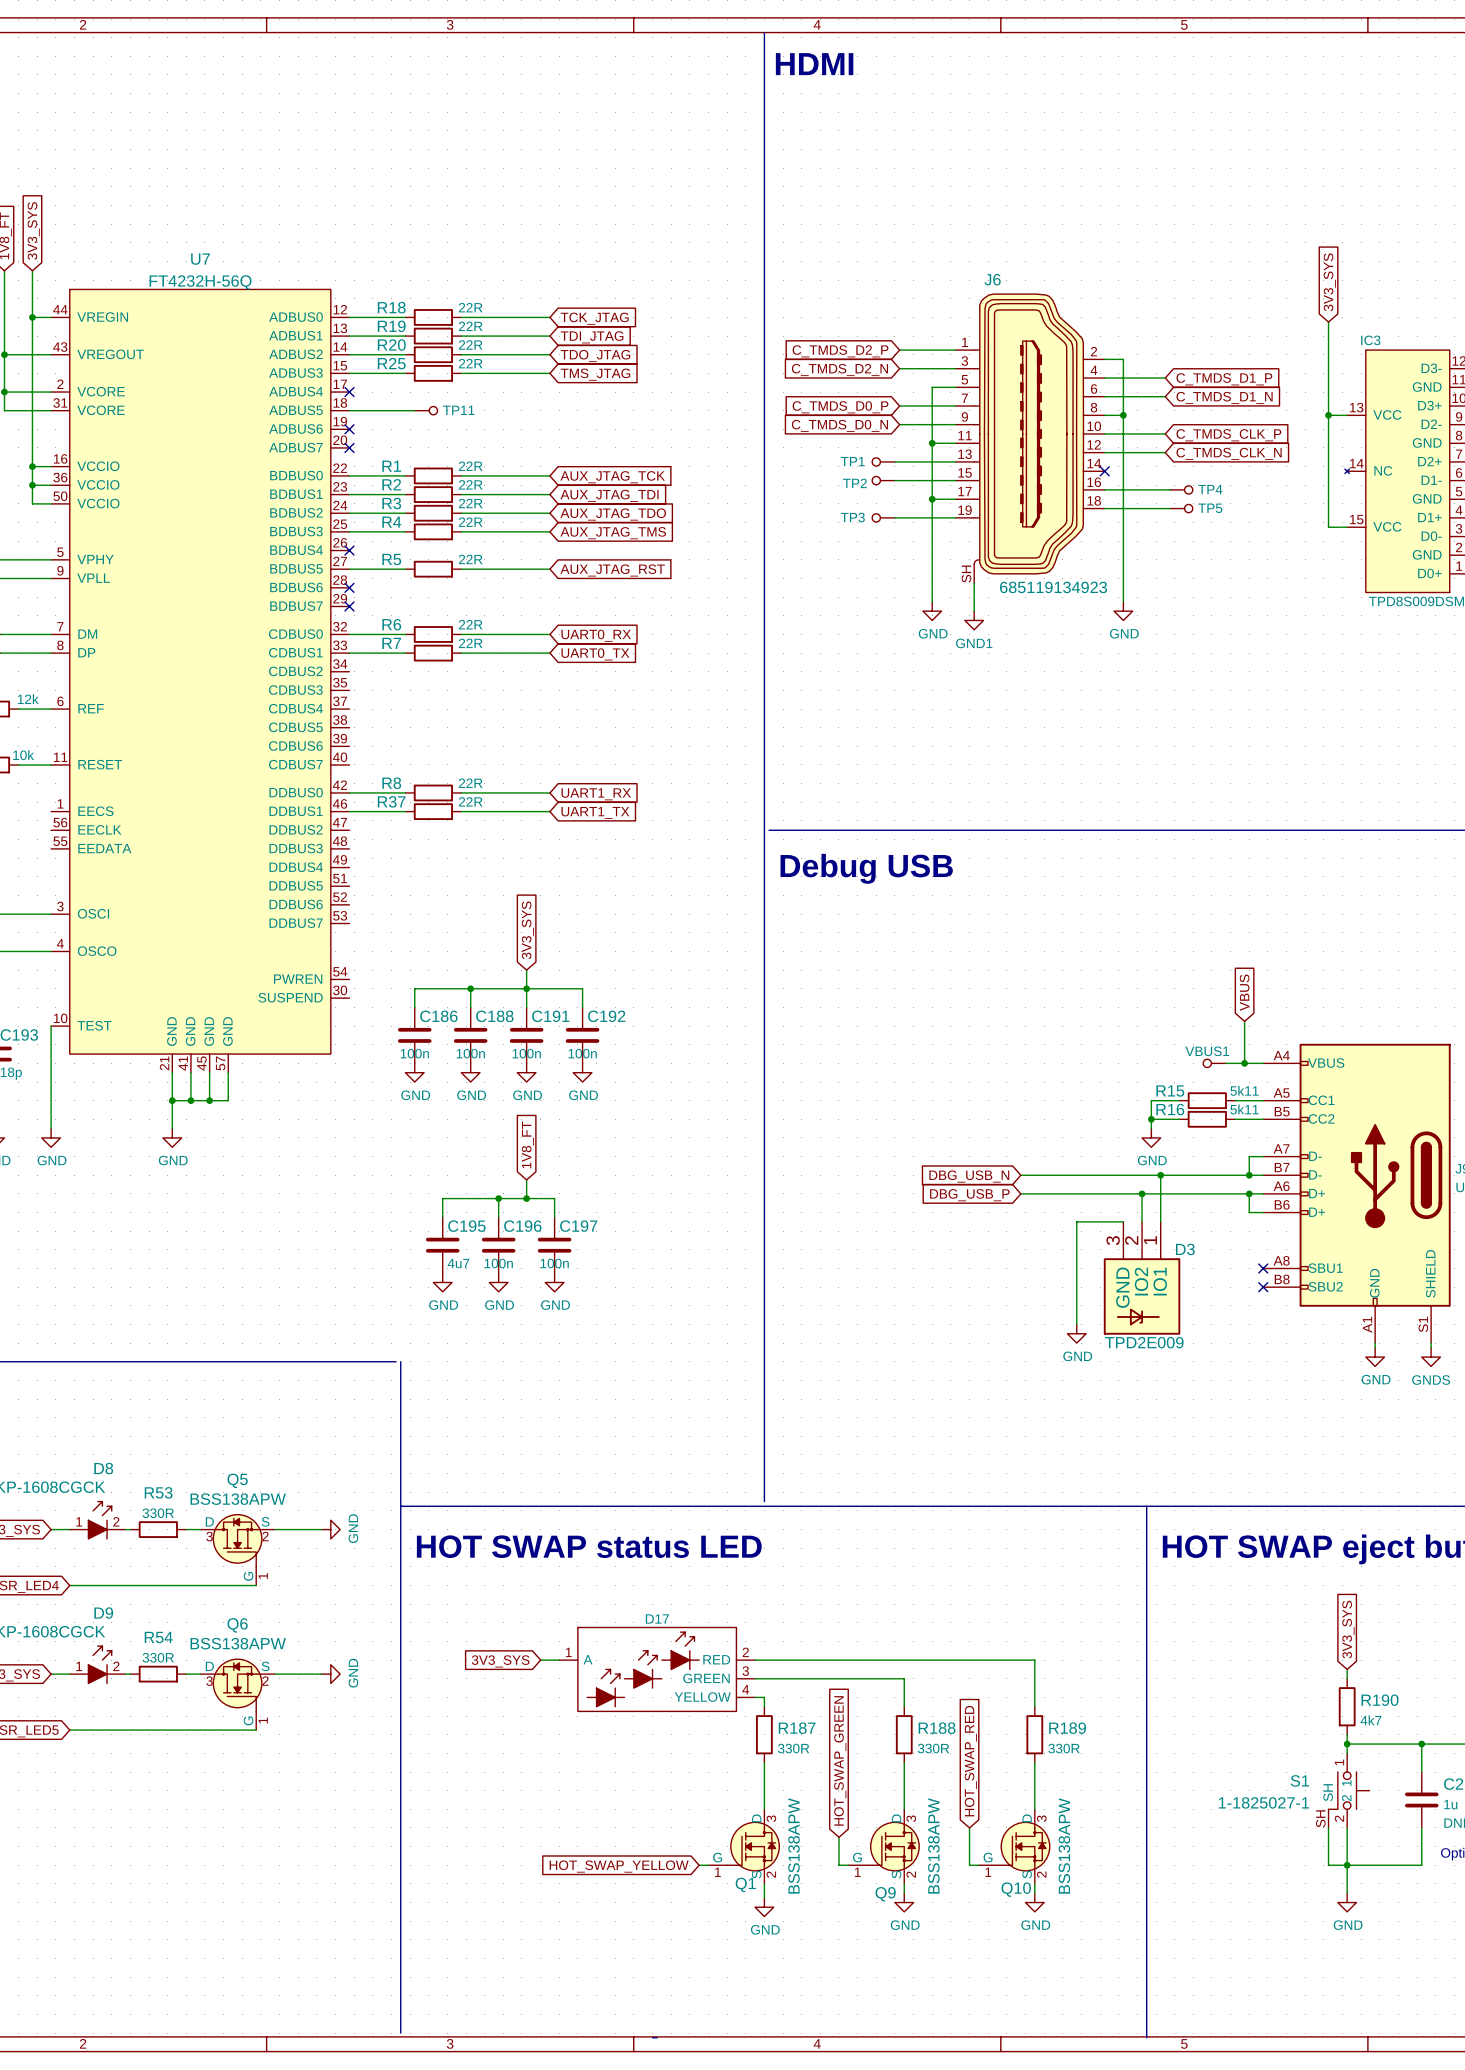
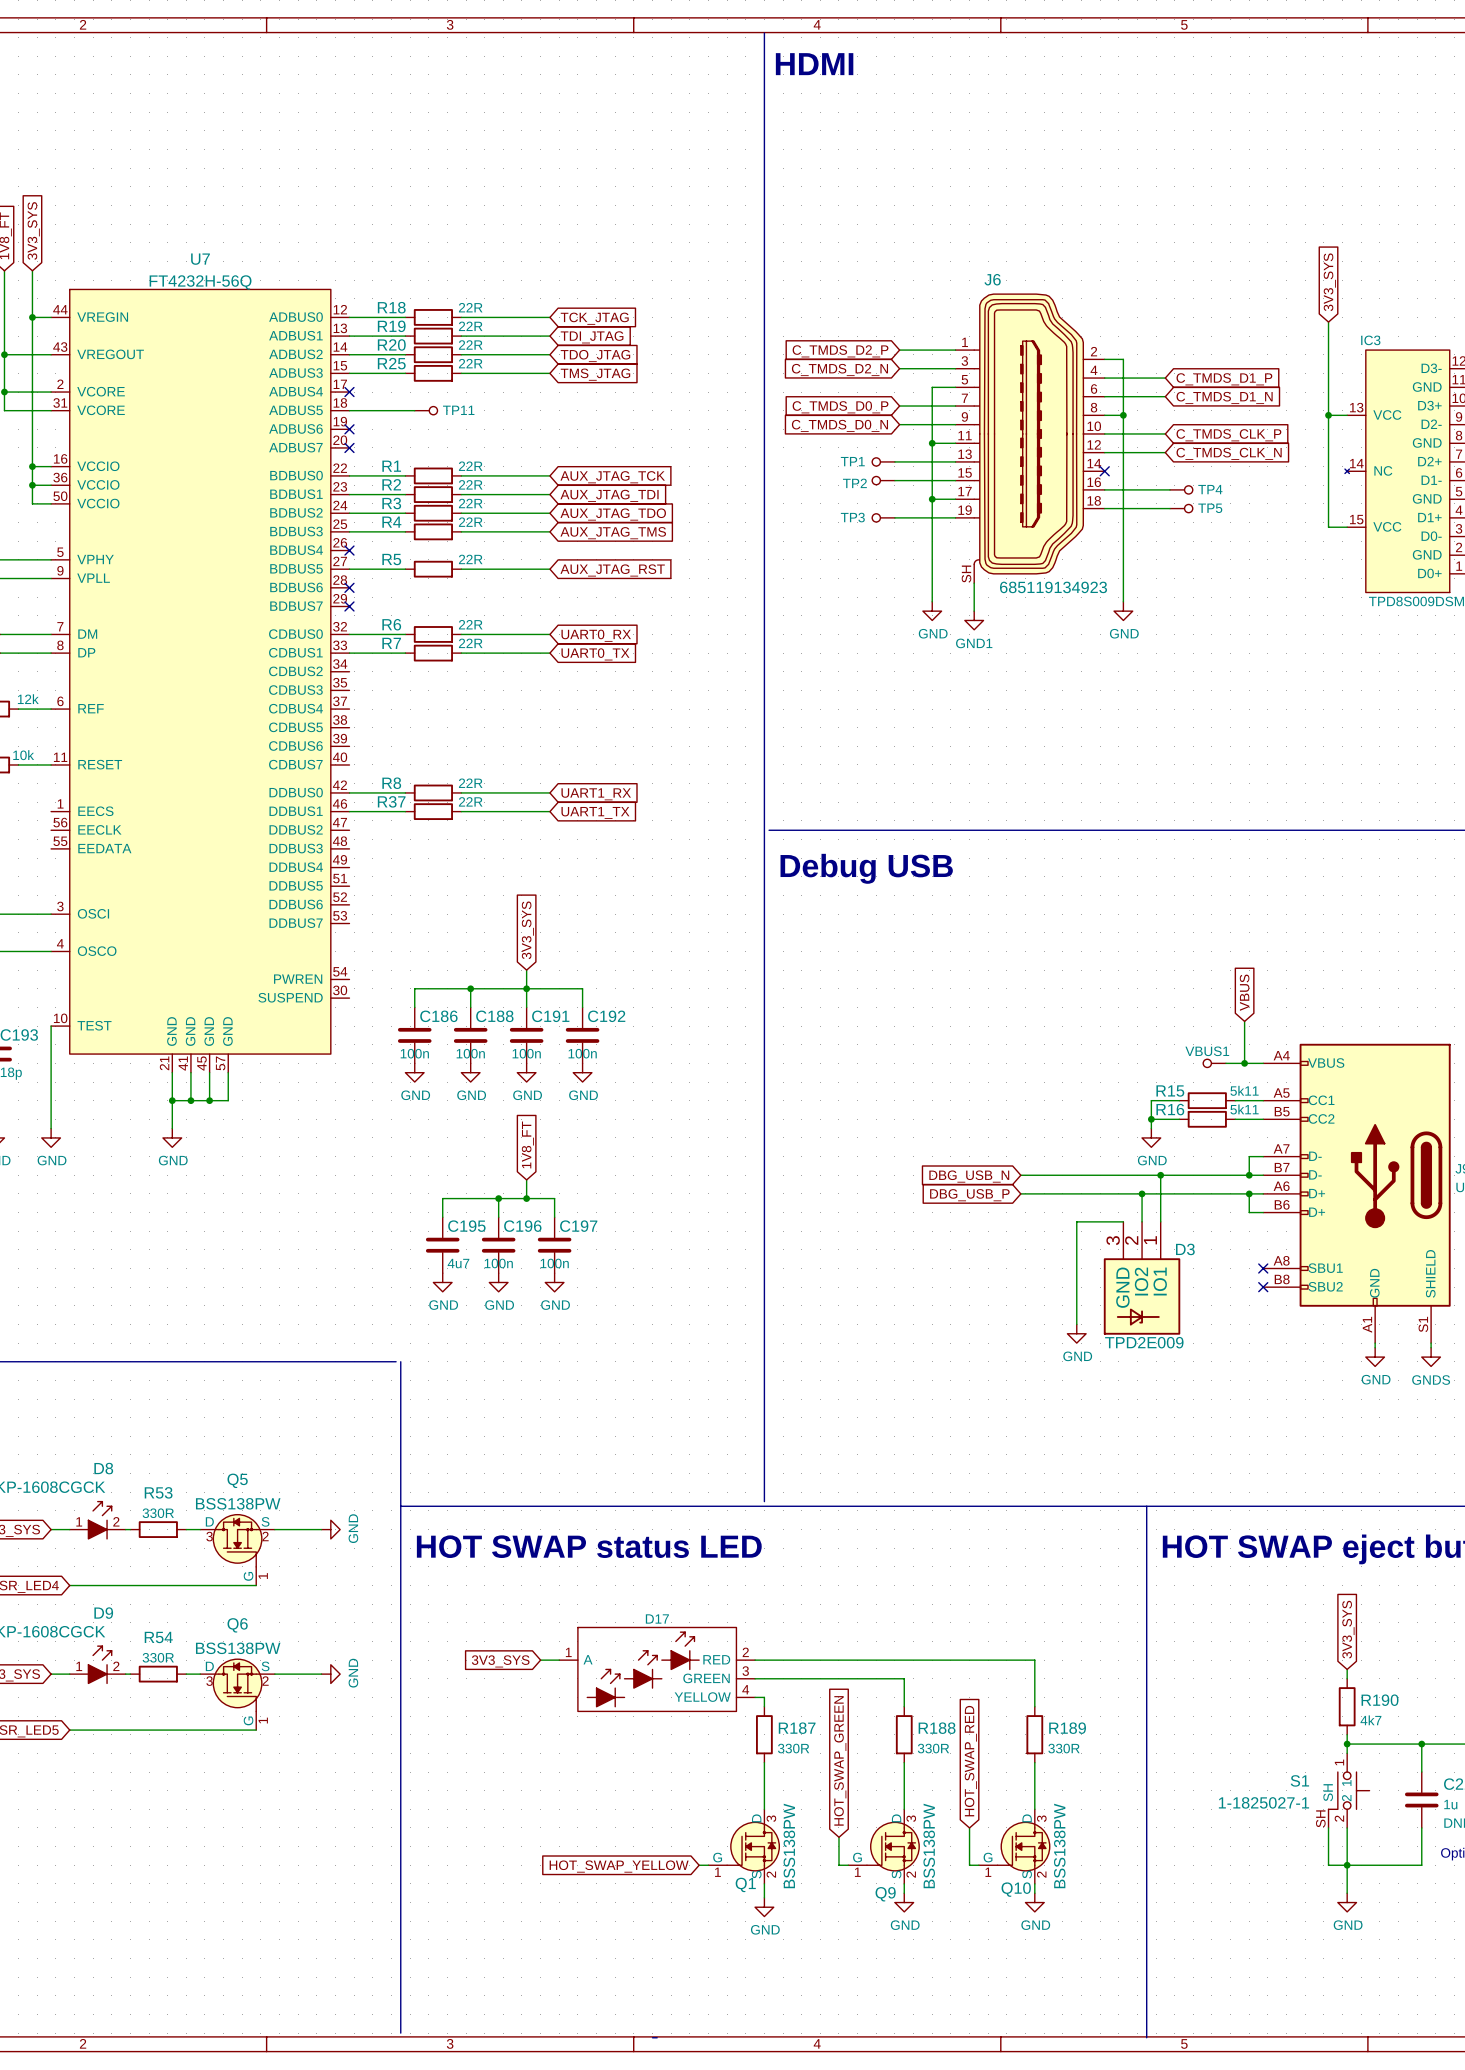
Q5 value: BSS138APW (238, 1499) -> BSS138PW (238, 1503)
Q6 value: BSS138APW (238, 1643) -> BSS138PW (238, 1648)
Q1 value: BSS138APW (794, 1845) -> BSS138PW (789, 1845)
Q9 value: BSS138APW (933, 1845) -> BSS138PW (929, 1845)
Q10 value: BSS138APW (1064, 1845) -> BSS138PW (1059, 1845)

